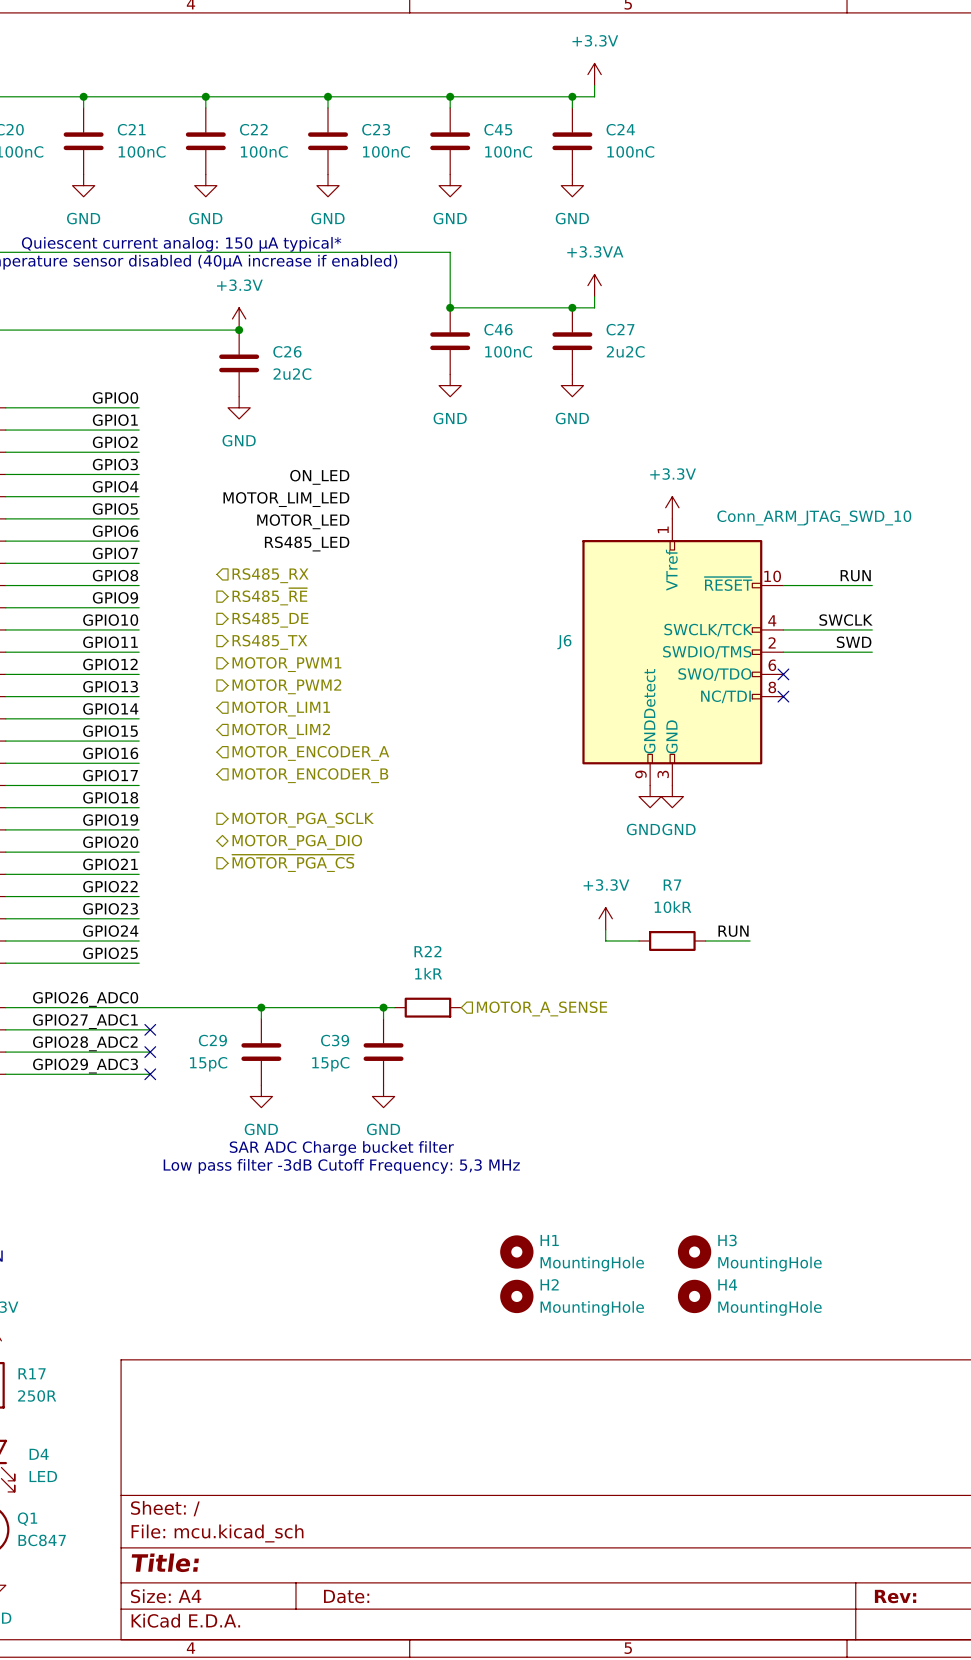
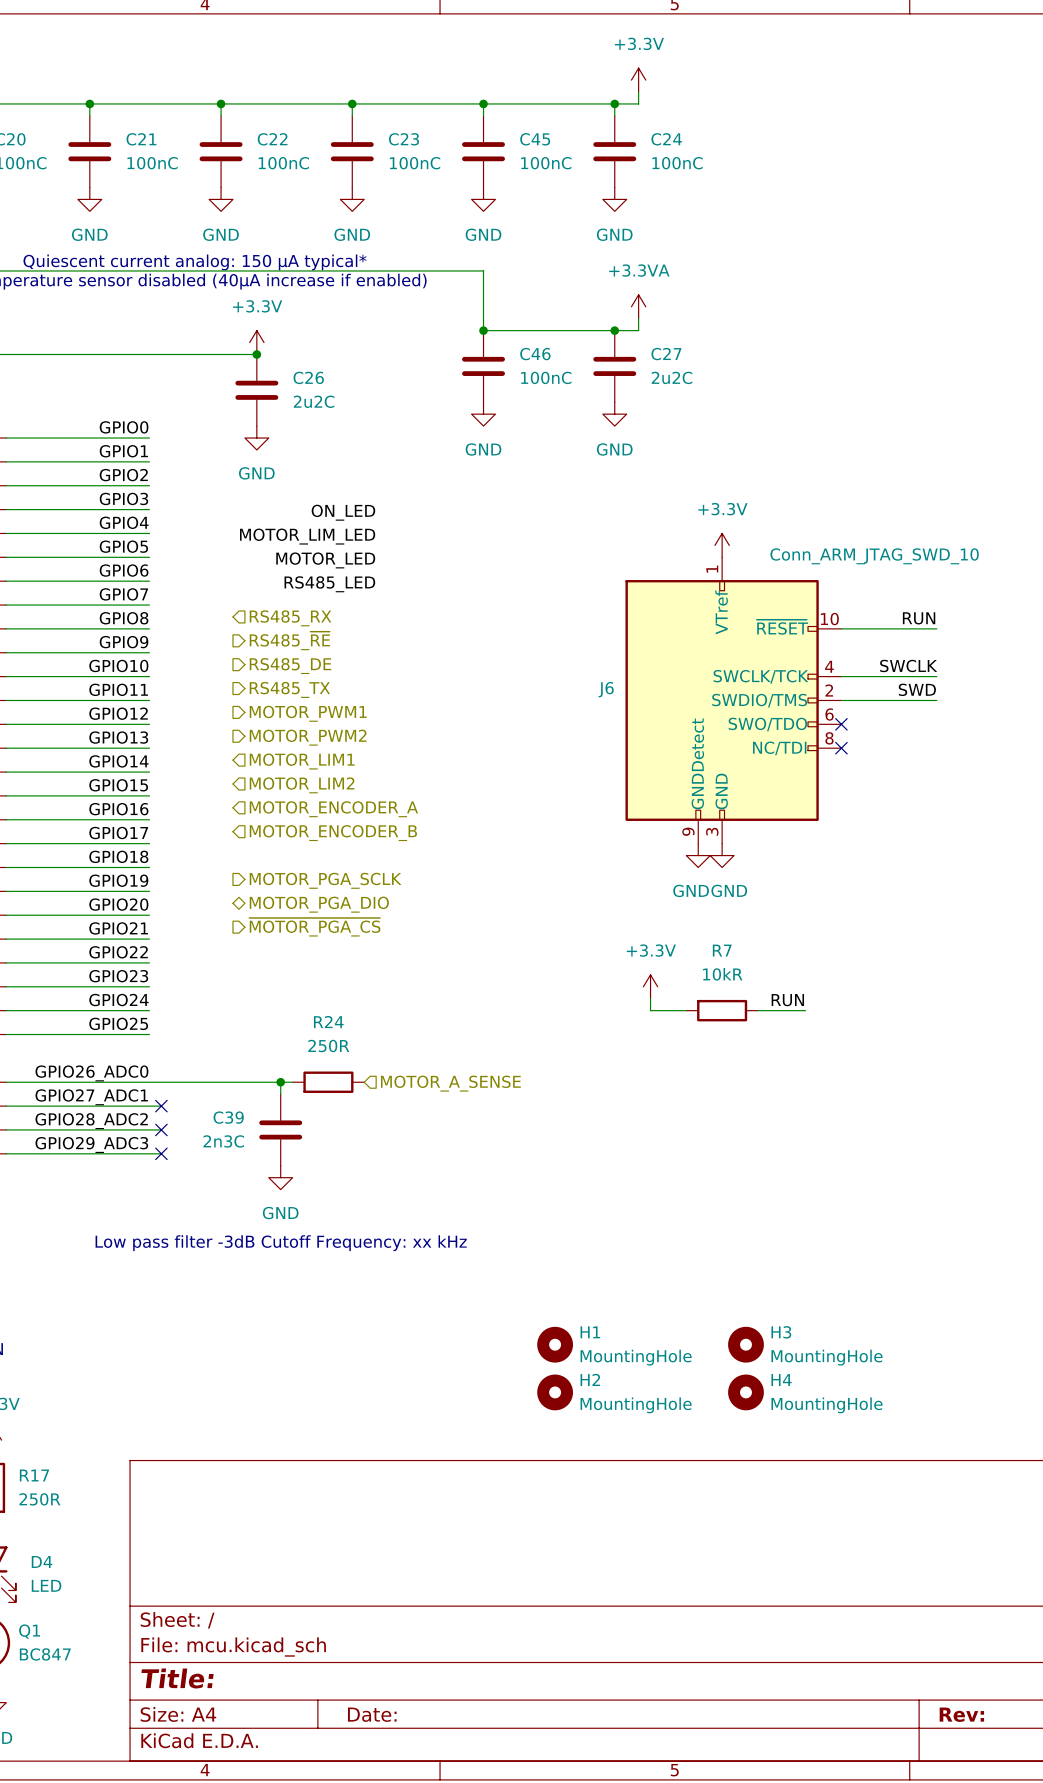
wire: (272, 1007) (394, 1007) -> none
R24: none -> 250R (328, 1082)
wire: (383, 1007) (383, 1018) -> none
junction: (383, 1007) -> none
R22: 1kR (427, 1007) -> none
hierarchical label position: MOTOR_A_SENSE (542, 1008) -> MOTOR_A_SENSE (450, 1083)
C29 name: C29 (212, 1040) -> C39 (228, 1117)
C39: 15pC (383, 1052) -> none
C29 value: 15pC (208, 1064) -> 2n3C (223, 1141)
power symbol: GND (383, 1096) -> none
text: SAR ADC Charge bucket filter (341, 1148) -> none
text: Low pass filter -3dB Cutoff Frequency: 5,3 MHz (341, 1166) -> Low pass filter -3dB Cutoff Frequency: xx kHz (281, 1243)

